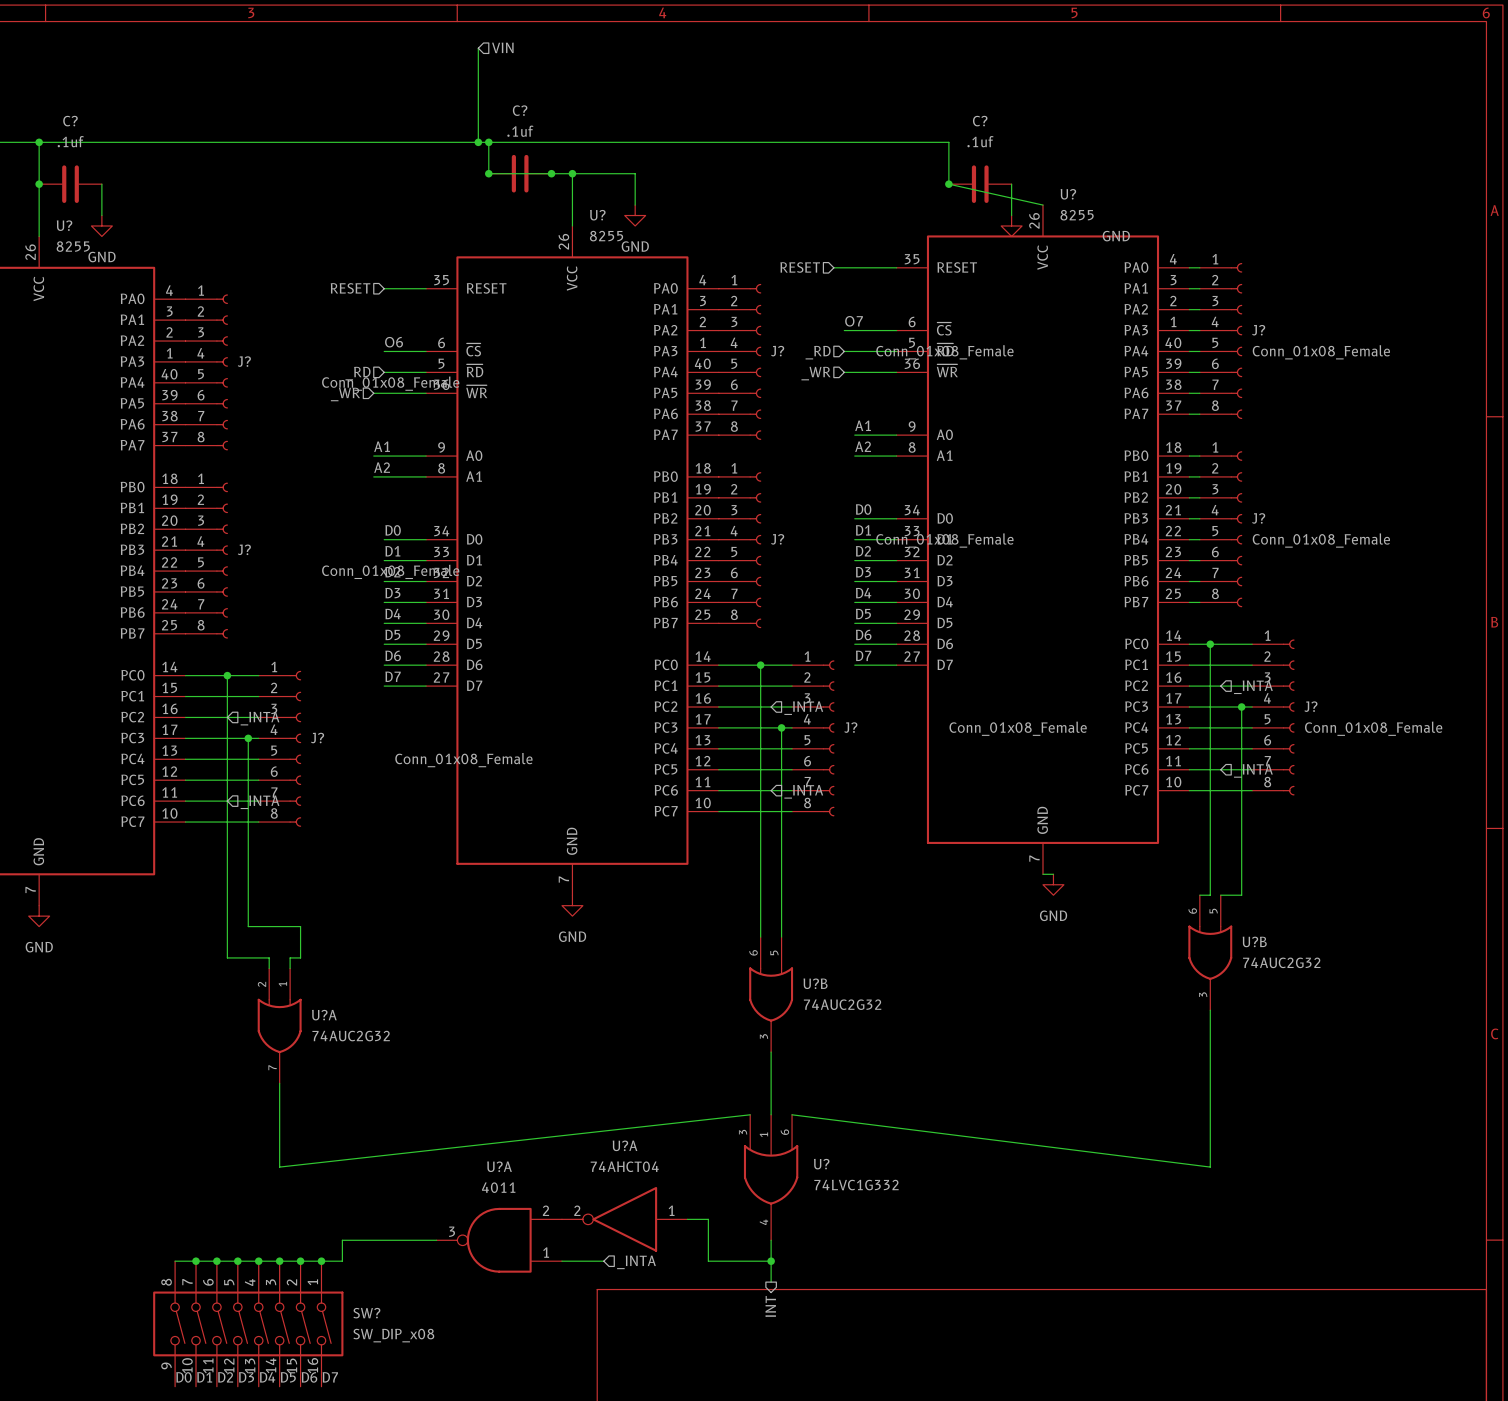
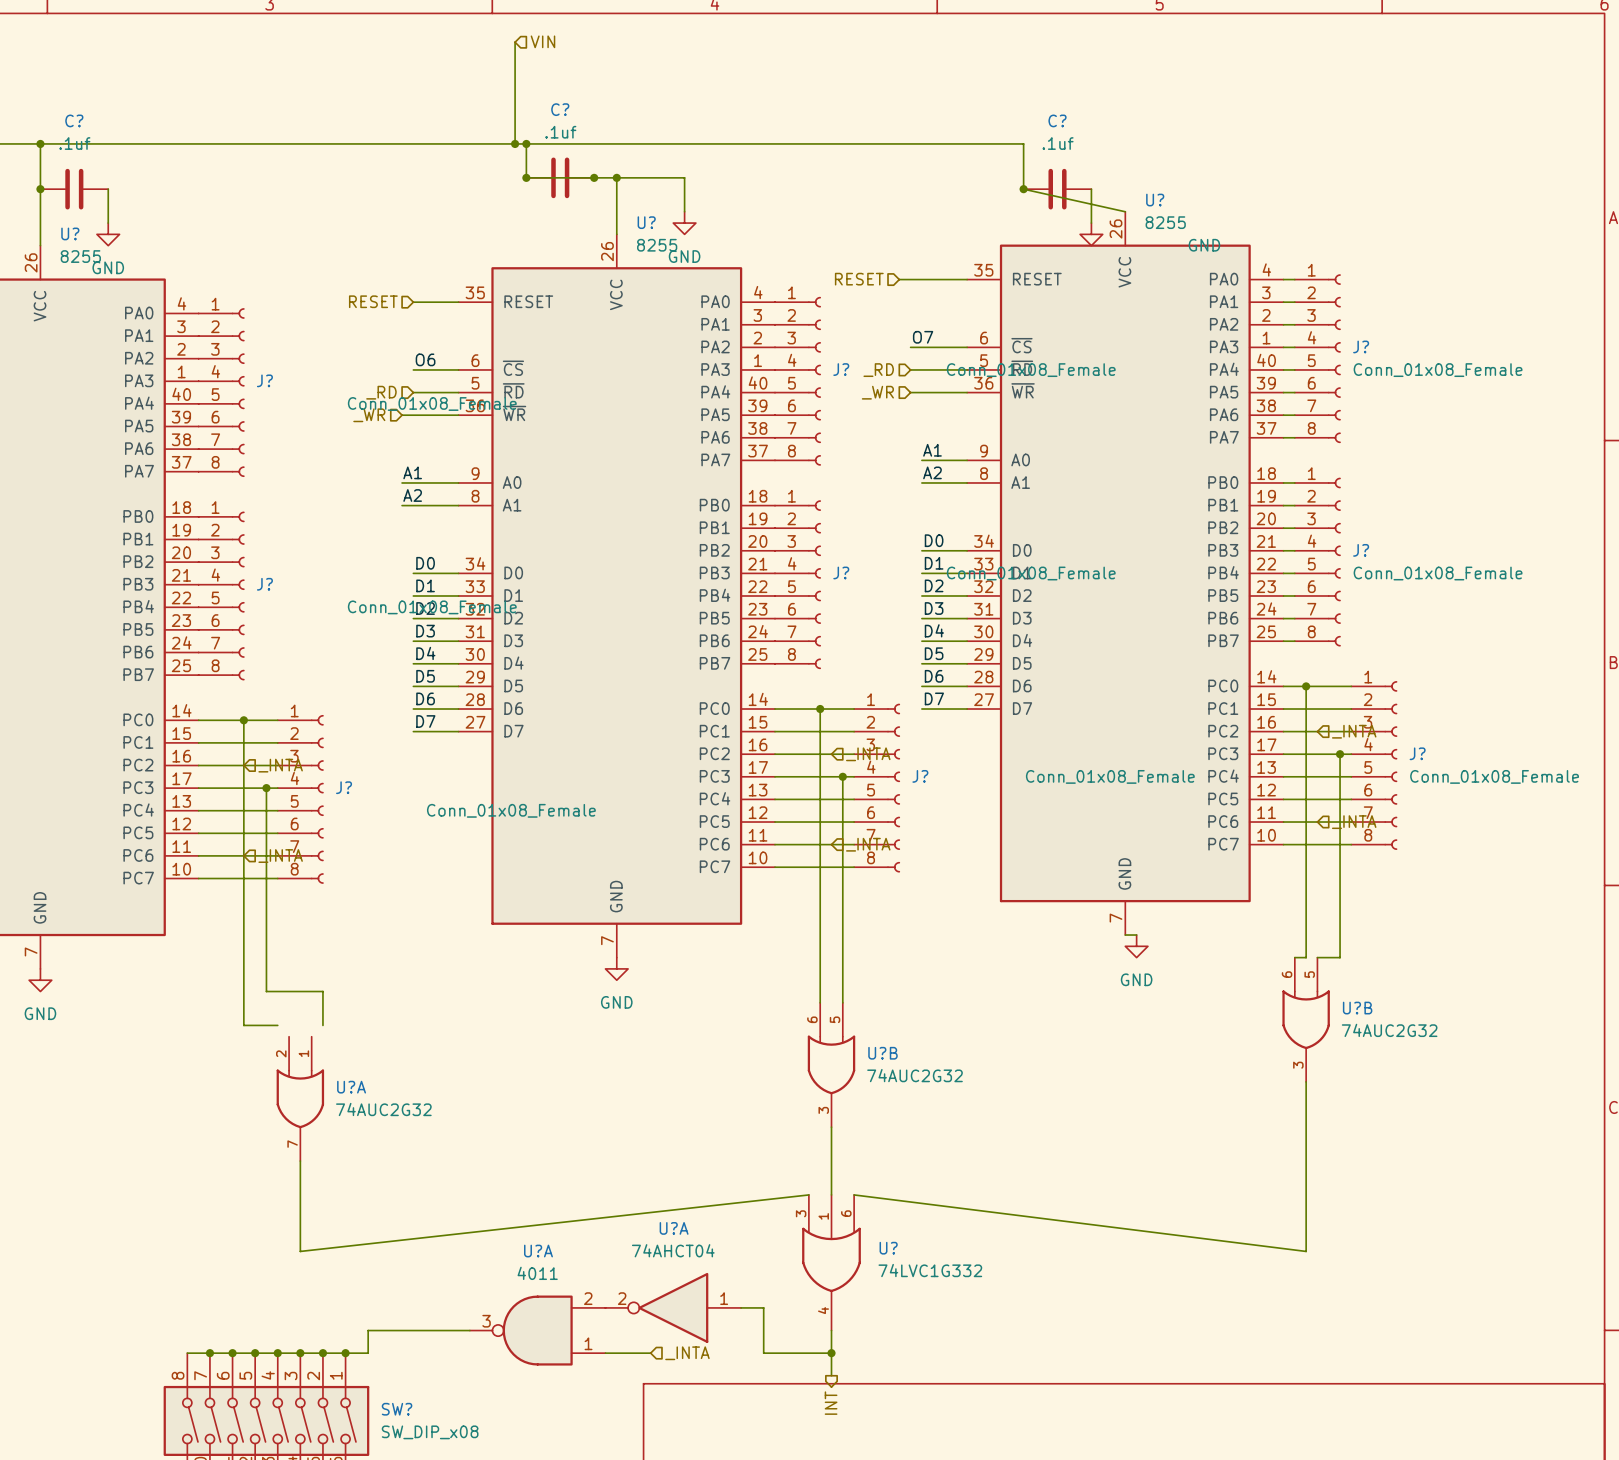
wire: (258, 957) (269, 957) (269, 968) -> none
wire: (300, 957) (290, 957) (290, 968) -> none

